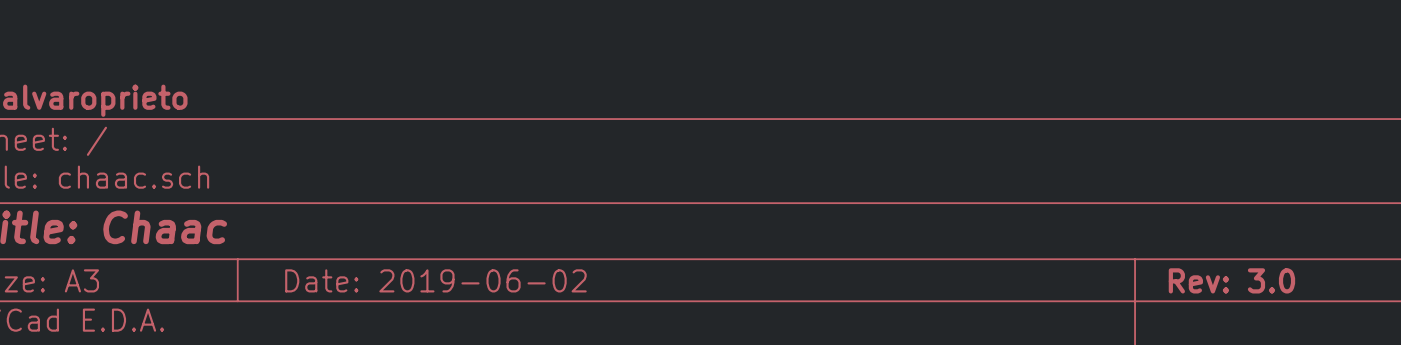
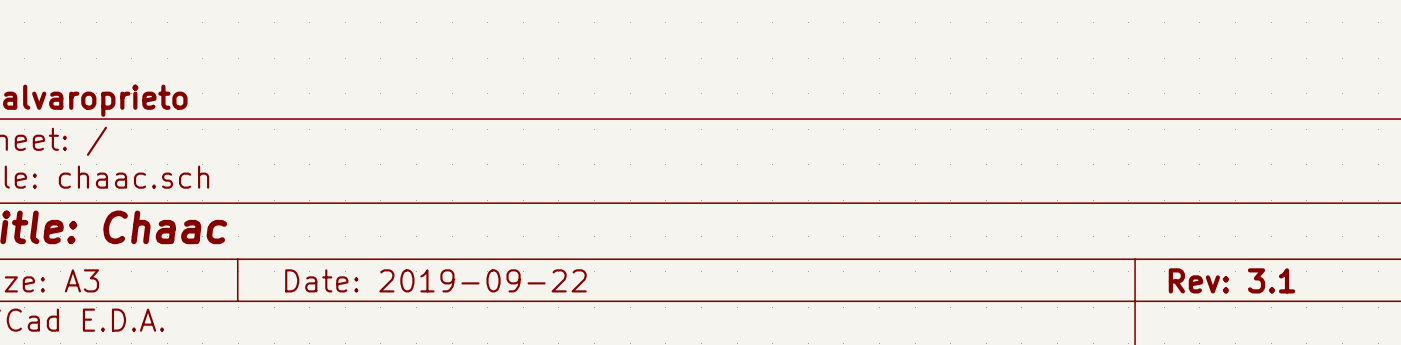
title block: Date: 2019-06-02 (435, 280) -> Date: 2019-09-22 (435, 280)
title block: Rev: 3.0 (1231, 280) -> Rev: 3.1 (1231, 280)

